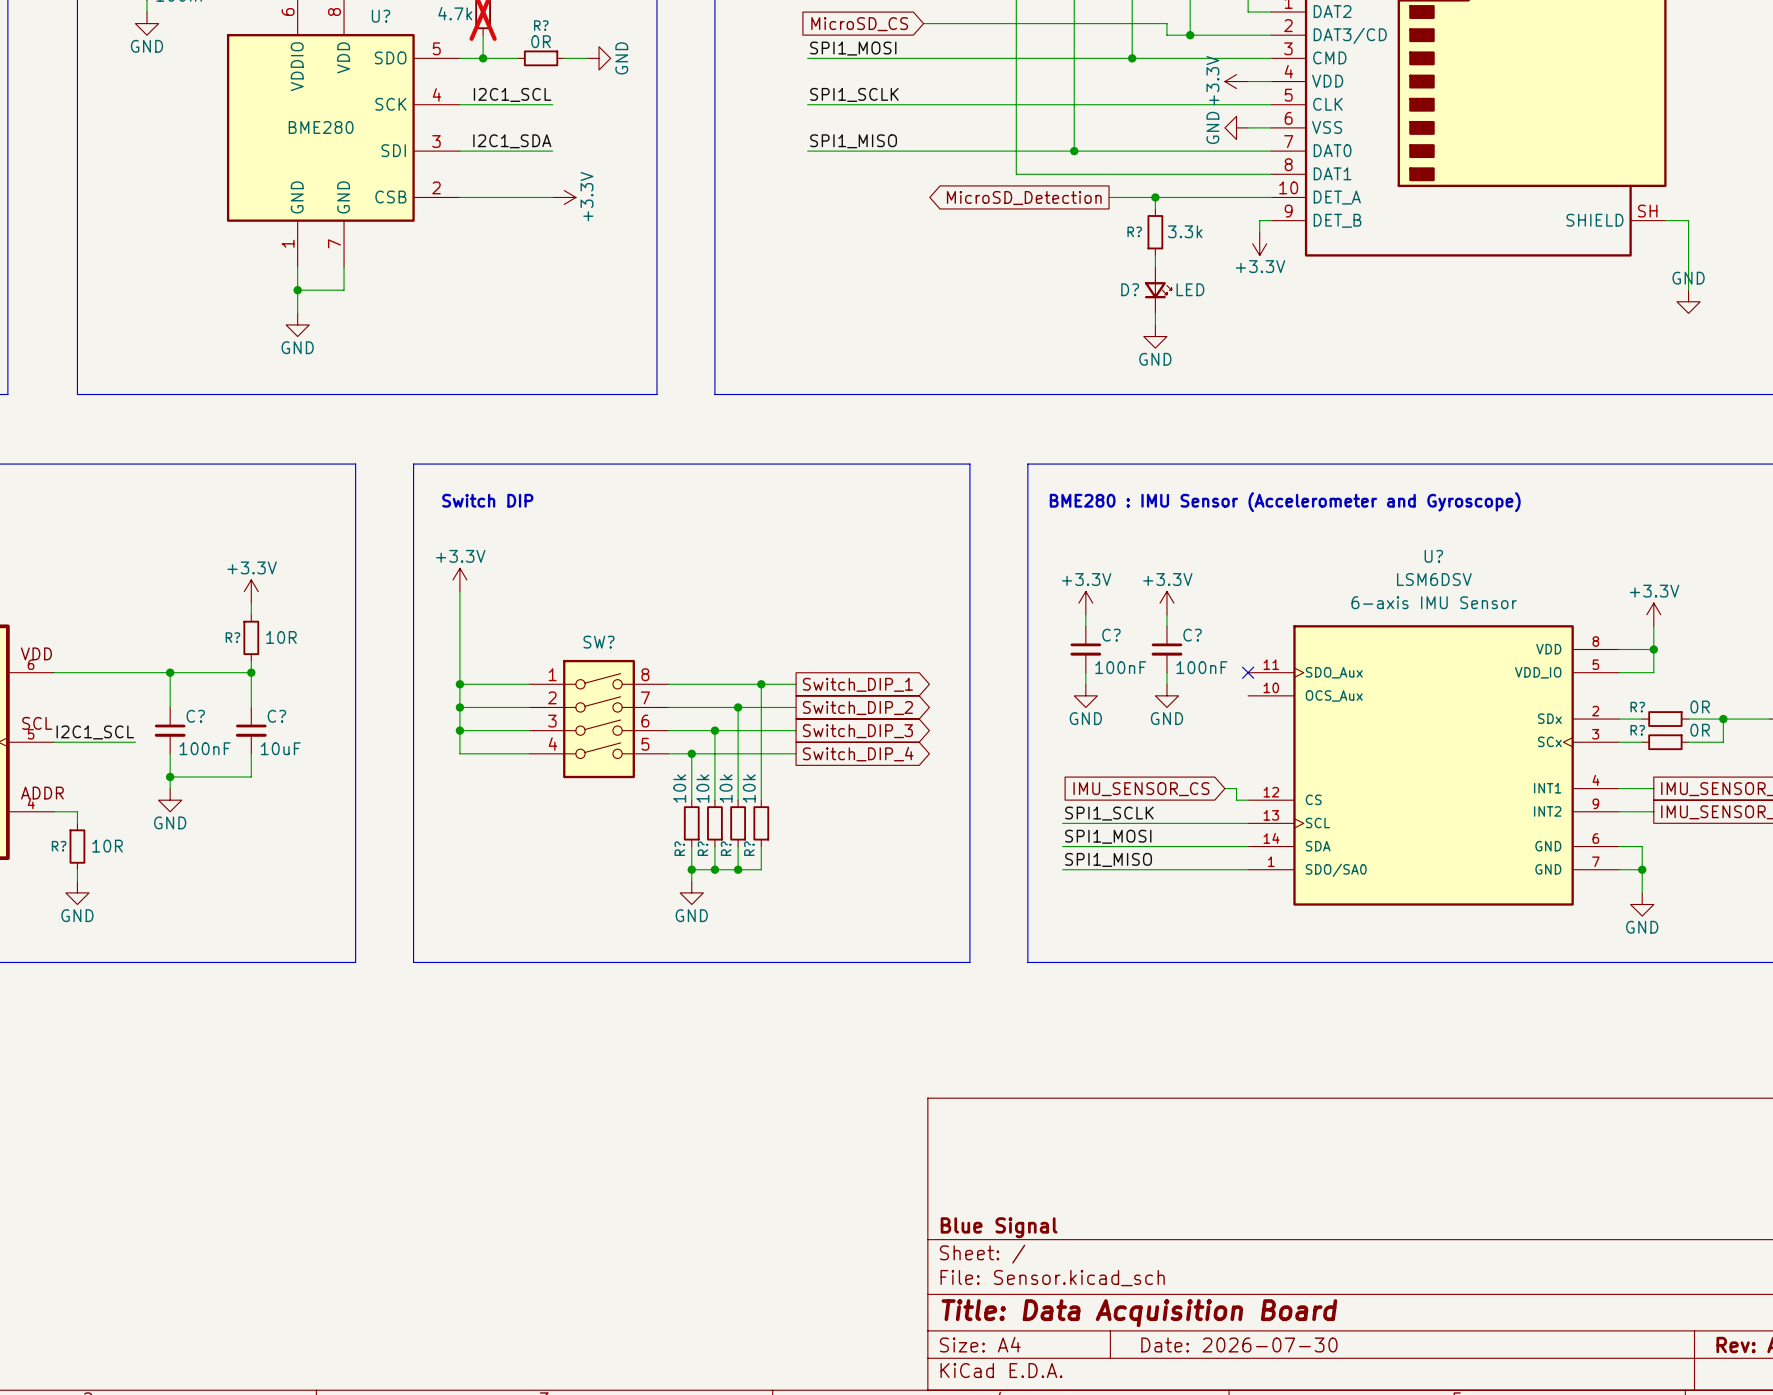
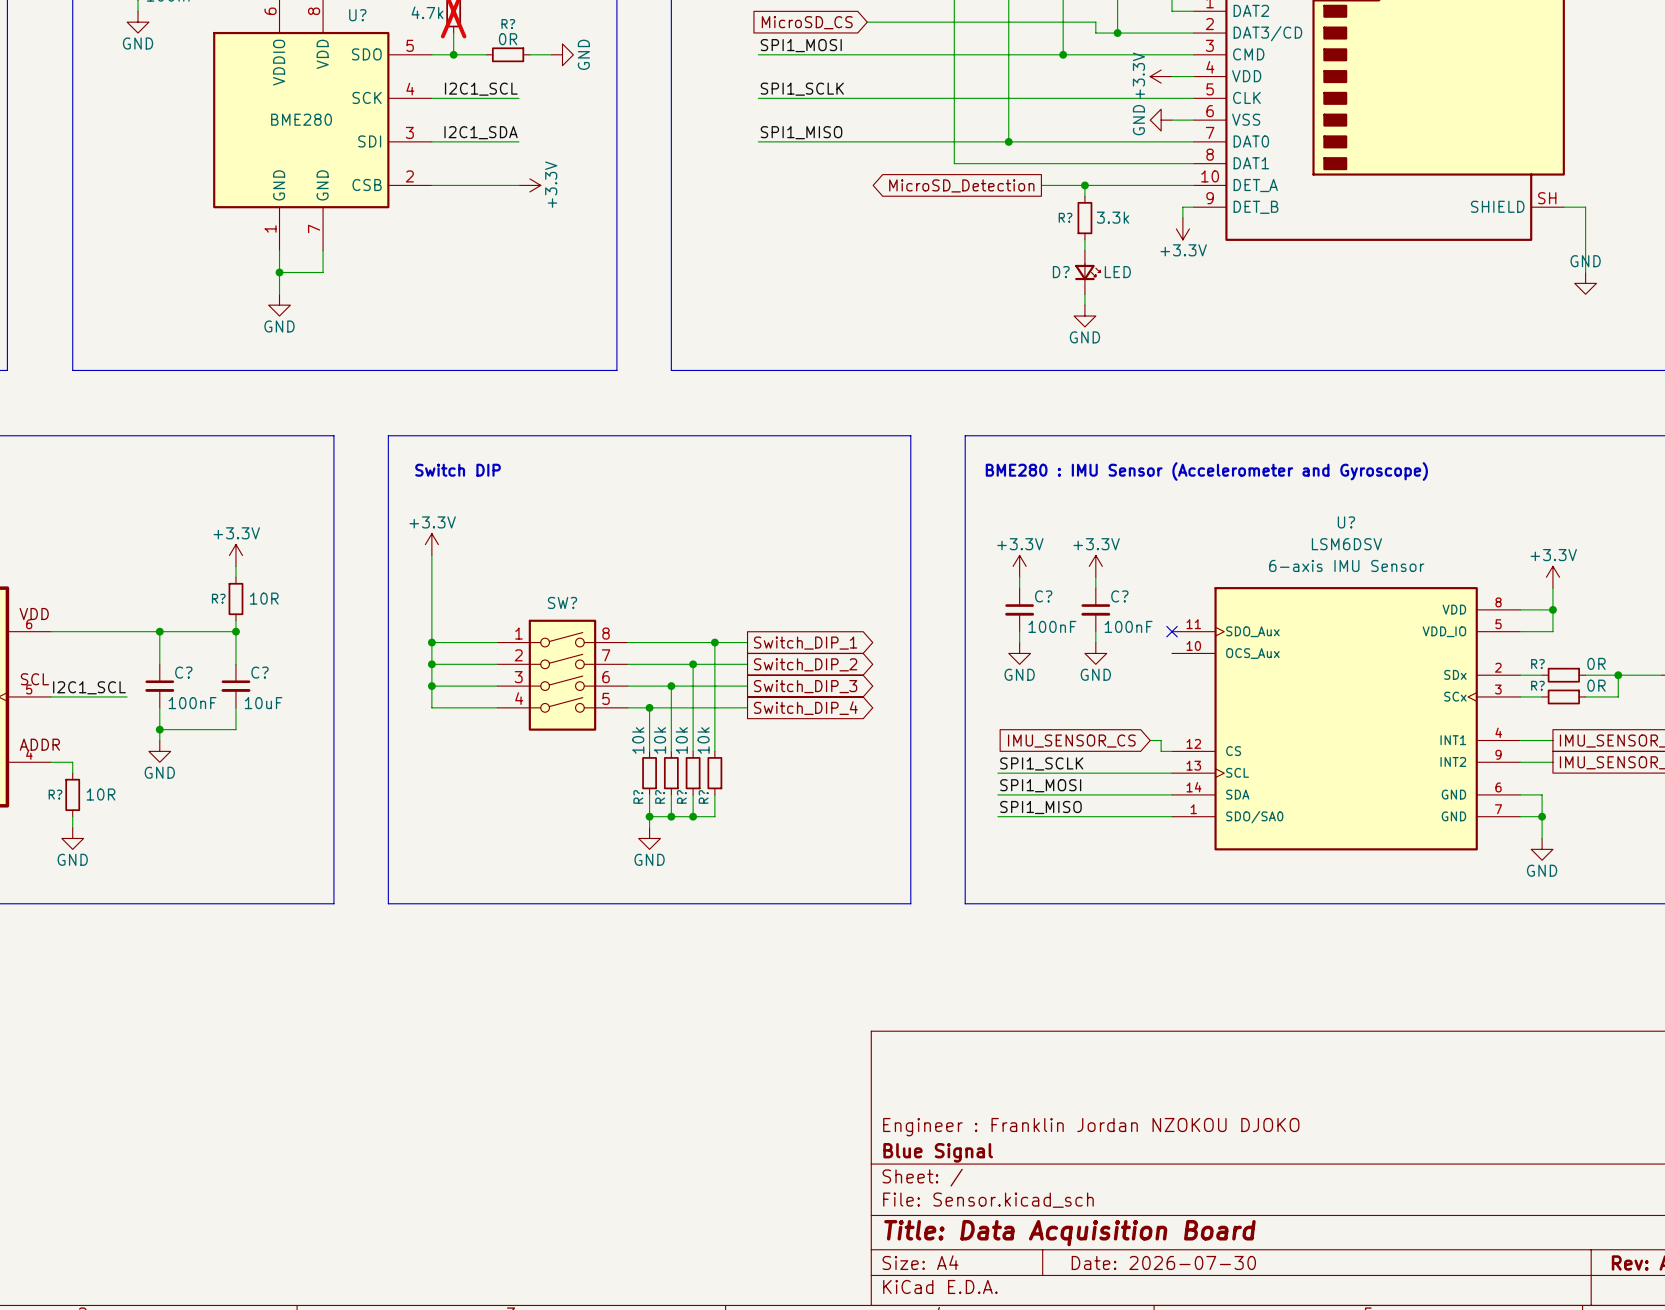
title block: none -> Engineer : Franklin Jordan NZOKOU DJOKO (1091, 1127)

